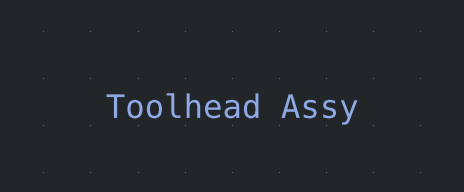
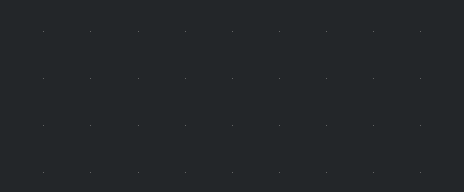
text: Toolhead Assy (231, 108) -> none

